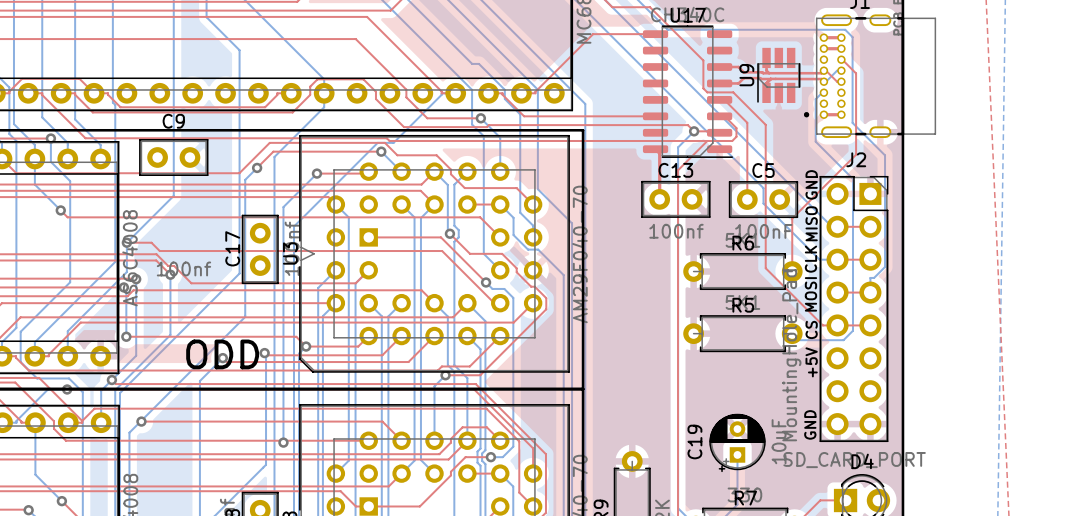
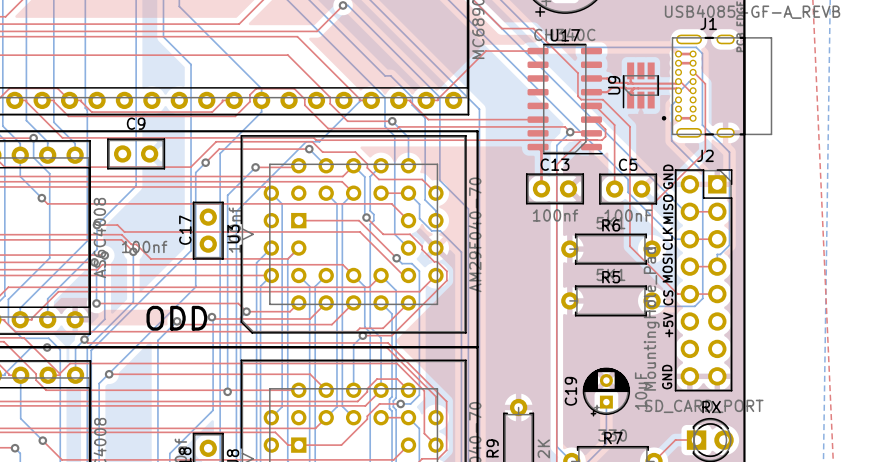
text: none -> RX (711, 407)
D4 name: D4 (862, 461) -> none

